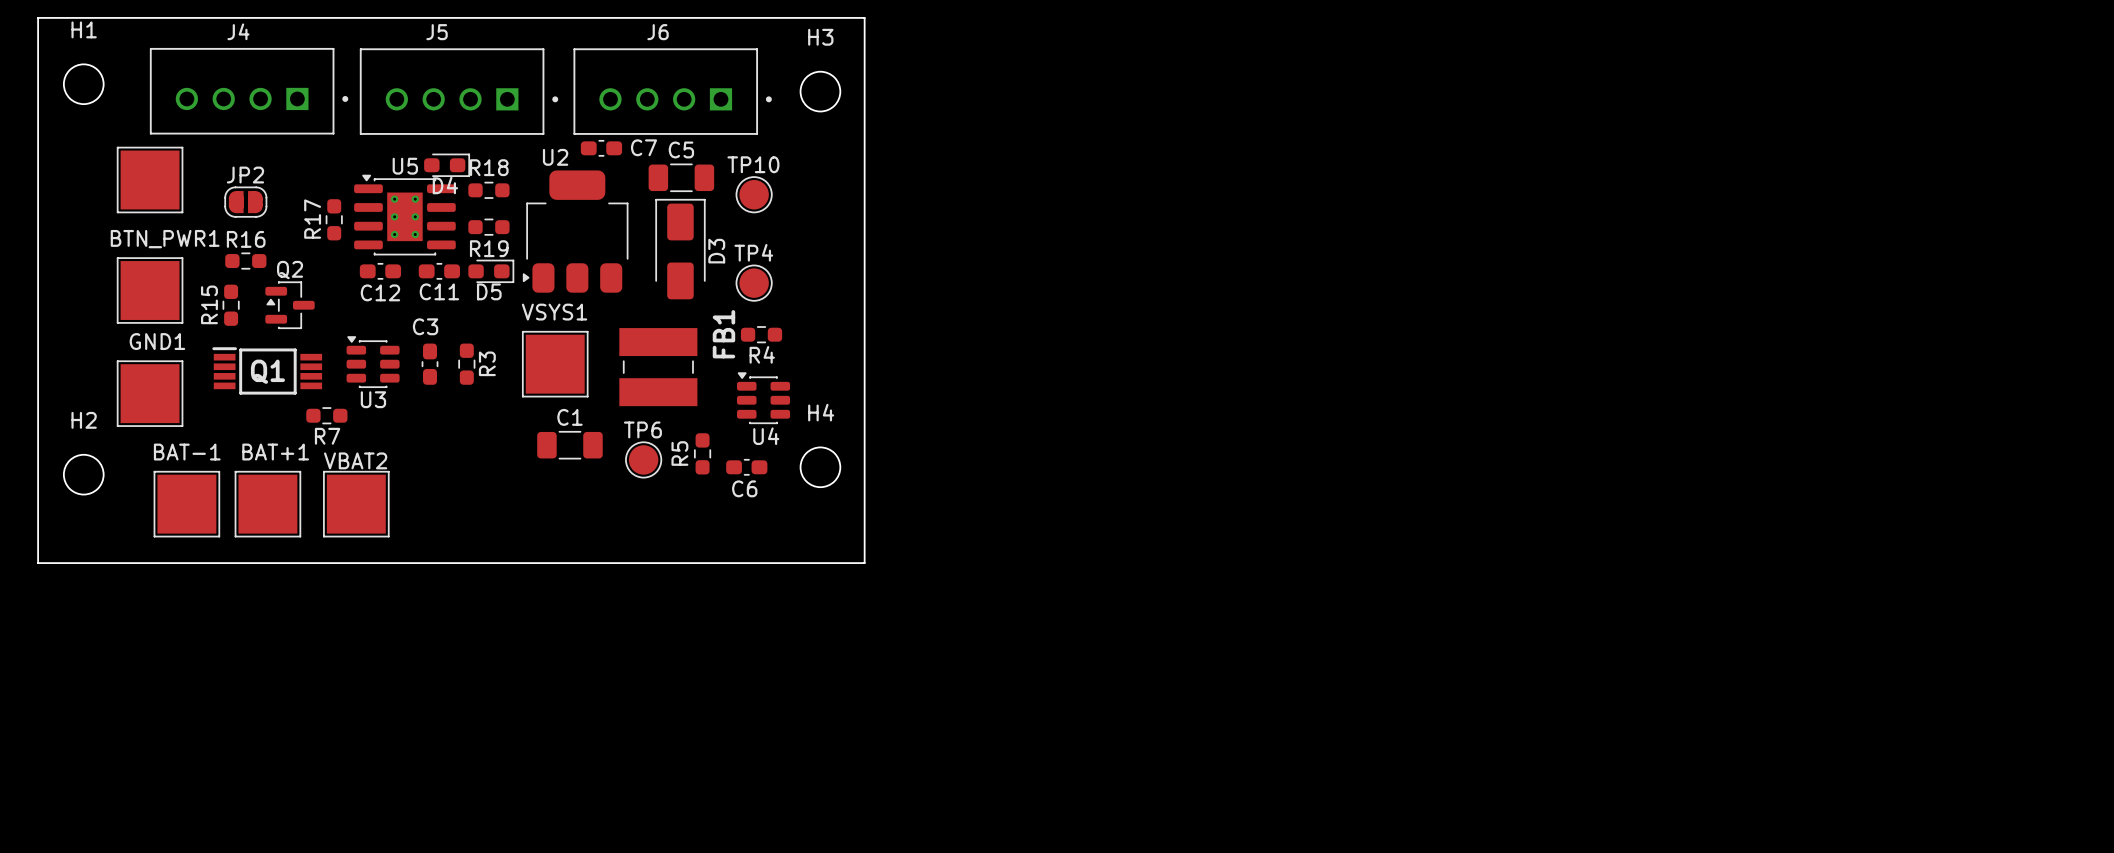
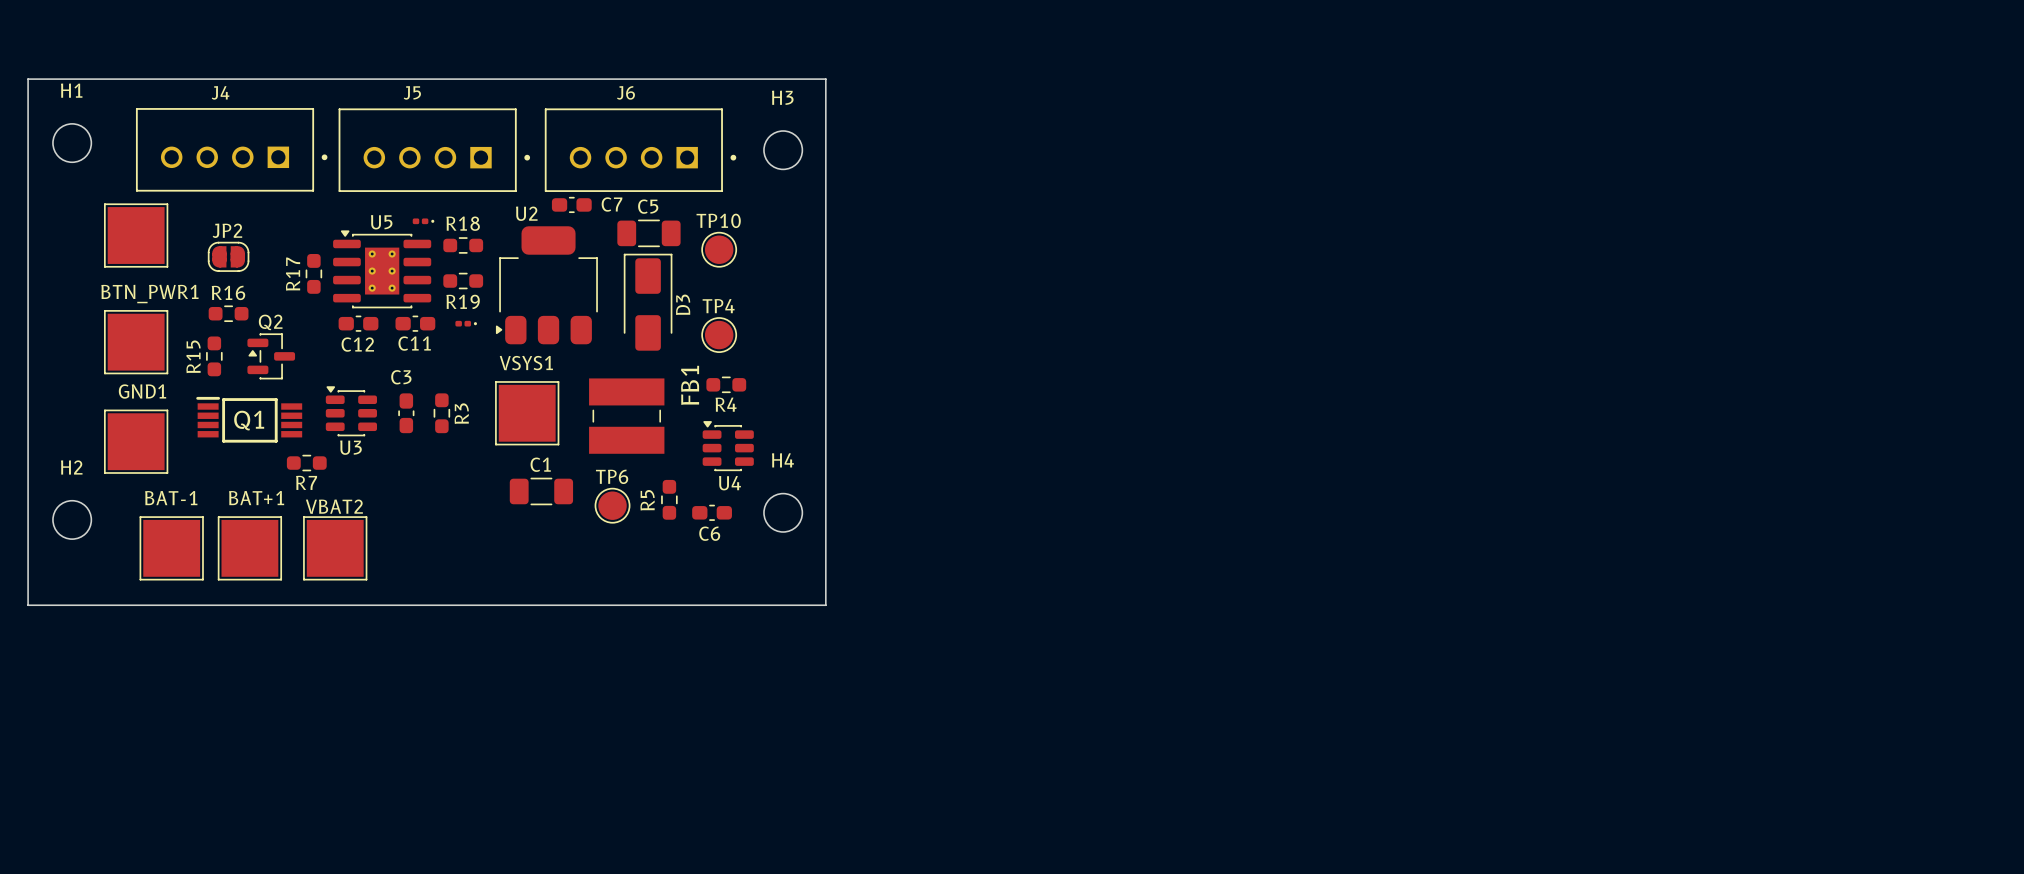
D4: (447, 165) -> none
part: none -> (423, 221)
D5: (491, 271) -> none
part: none -> (466, 323)

